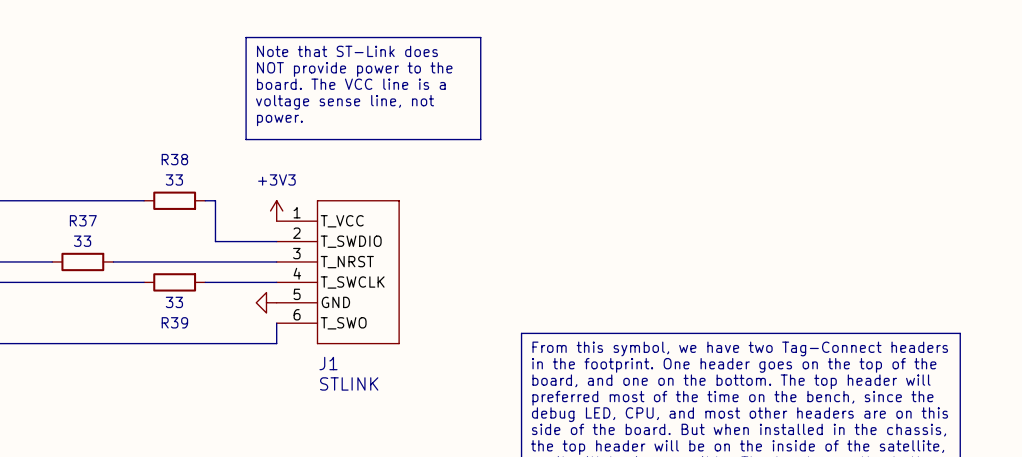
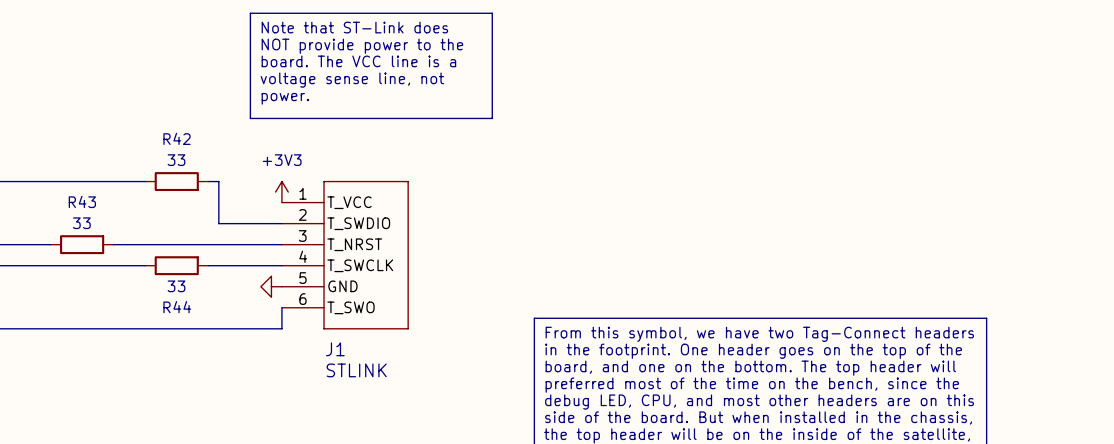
R38 name: R38 (174, 159) -> R42 (177, 138)
R37 name: R37 (83, 220) -> R43 (82, 201)
R39 name: R39 (174, 322) -> R44 (177, 307)

